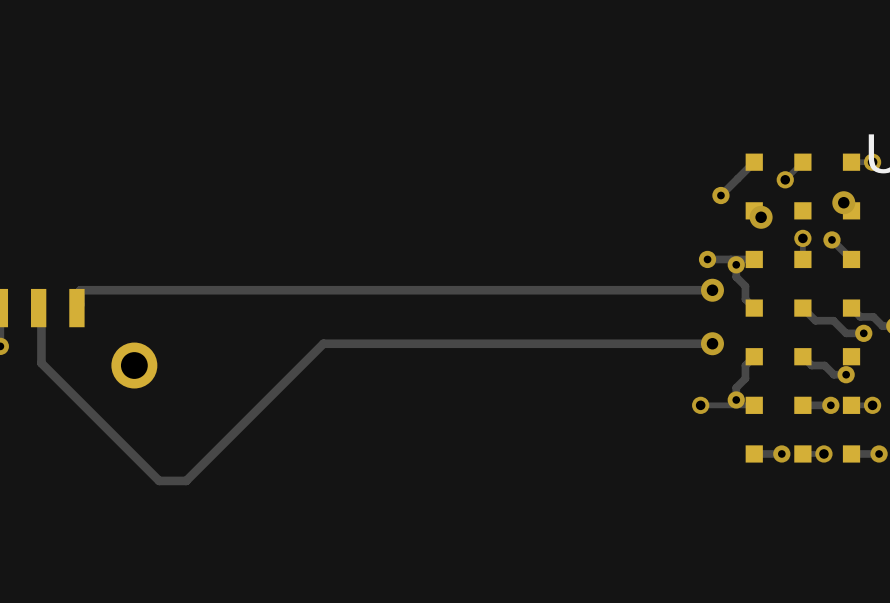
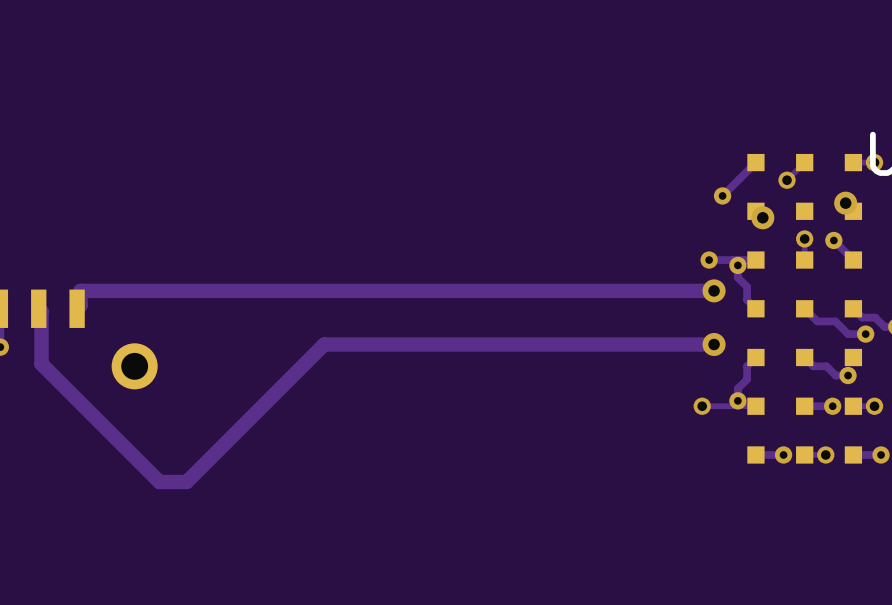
track width: thin (712, 290) (80, 290) (80, 304) (76, 308) -> thick (714, 290) (80, 290) (80, 305) (77, 308)
track width: thin (38, 308) (41, 310) (41, 363) (159, 480) (186, 480) (323, 343) (712, 343) -> thick (38, 308) (41, 311) (41, 363) (159, 482) (186, 482) (324, 344) (714, 344)

